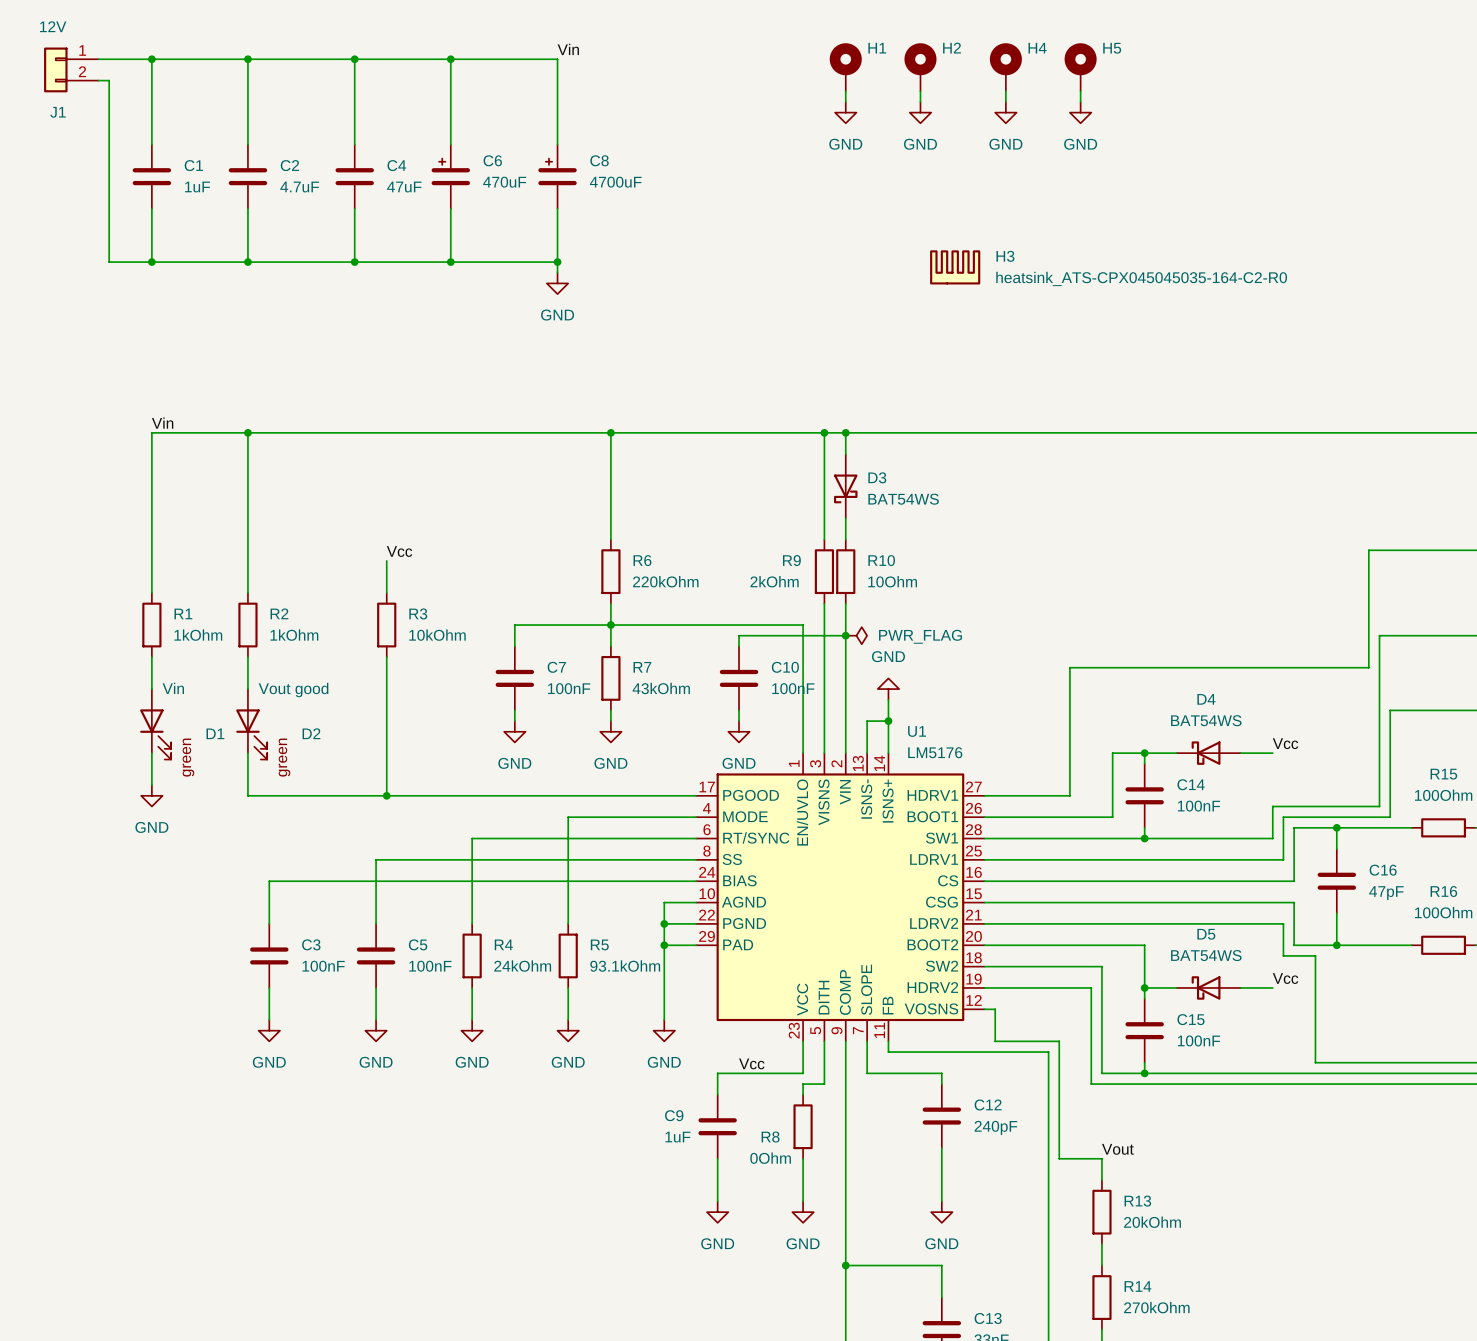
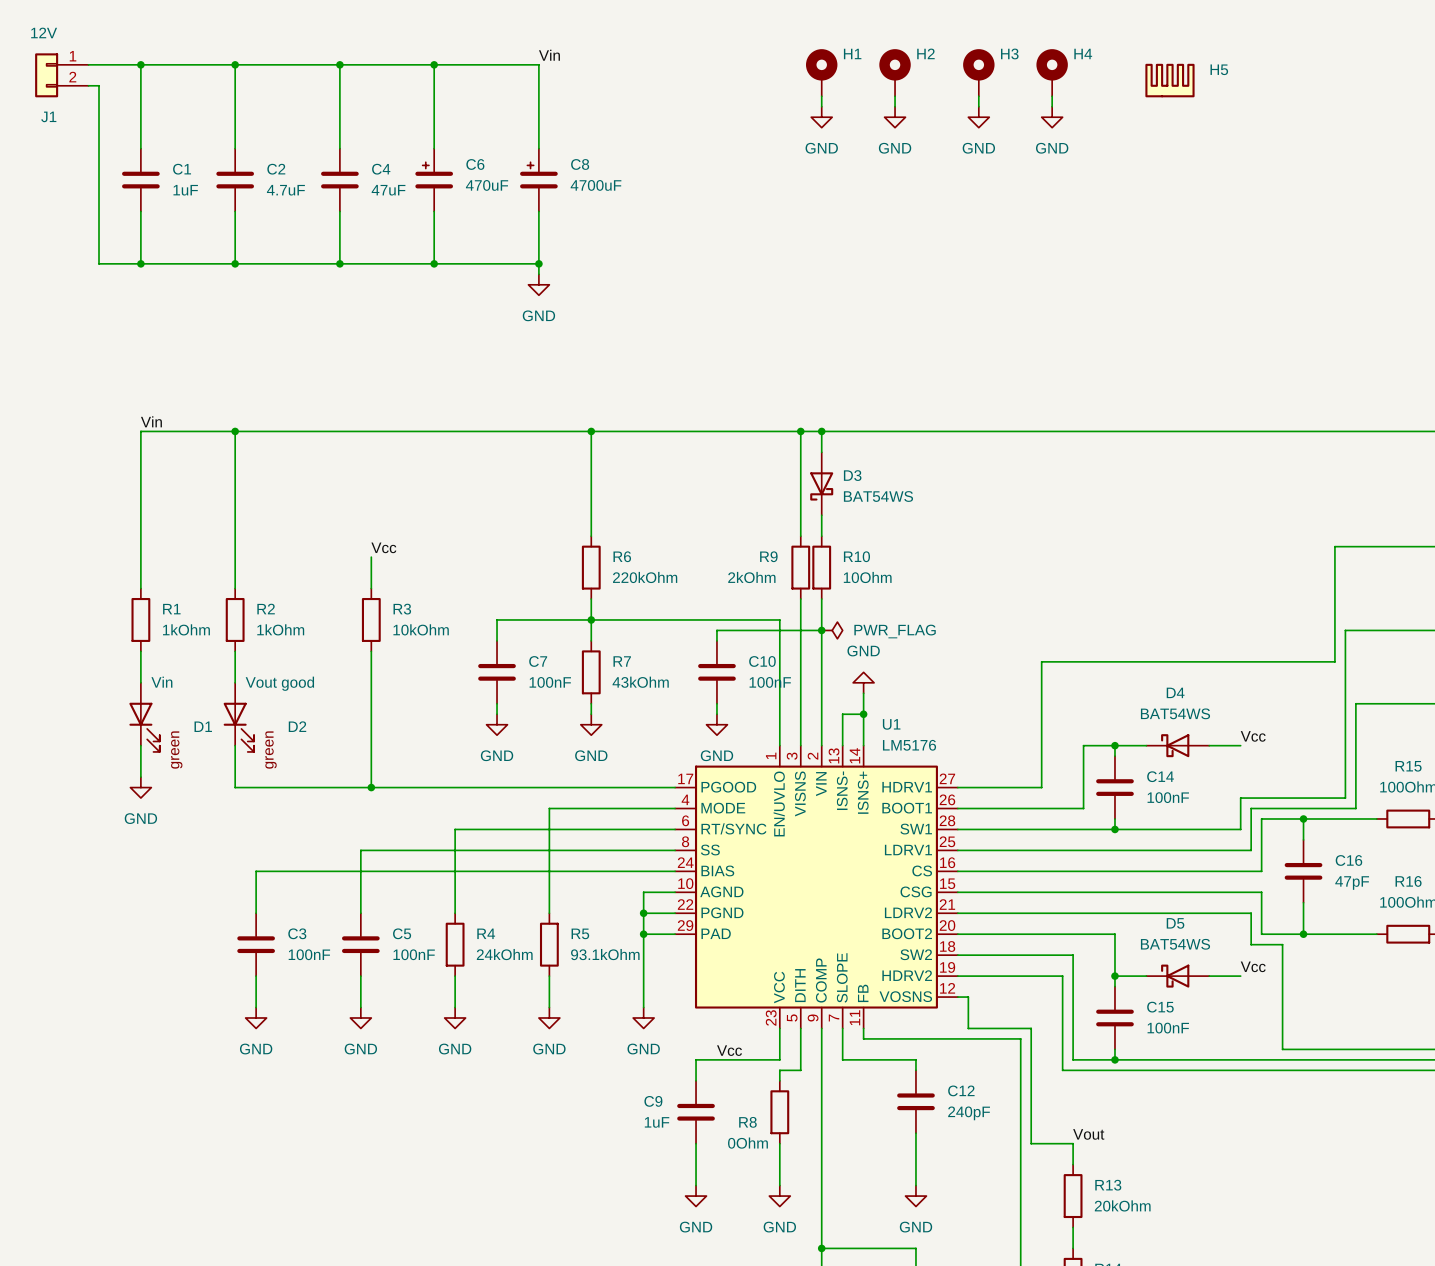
H4 name: H4 (1037, 48) -> H3 (1009, 53)
H5 name: H5 (1112, 48) -> H4 (1083, 53)
H5: none -> (1169, 80)
H3: heatsink_ATS-CPX045045035-164-C2-R0 (955, 267) -> none

